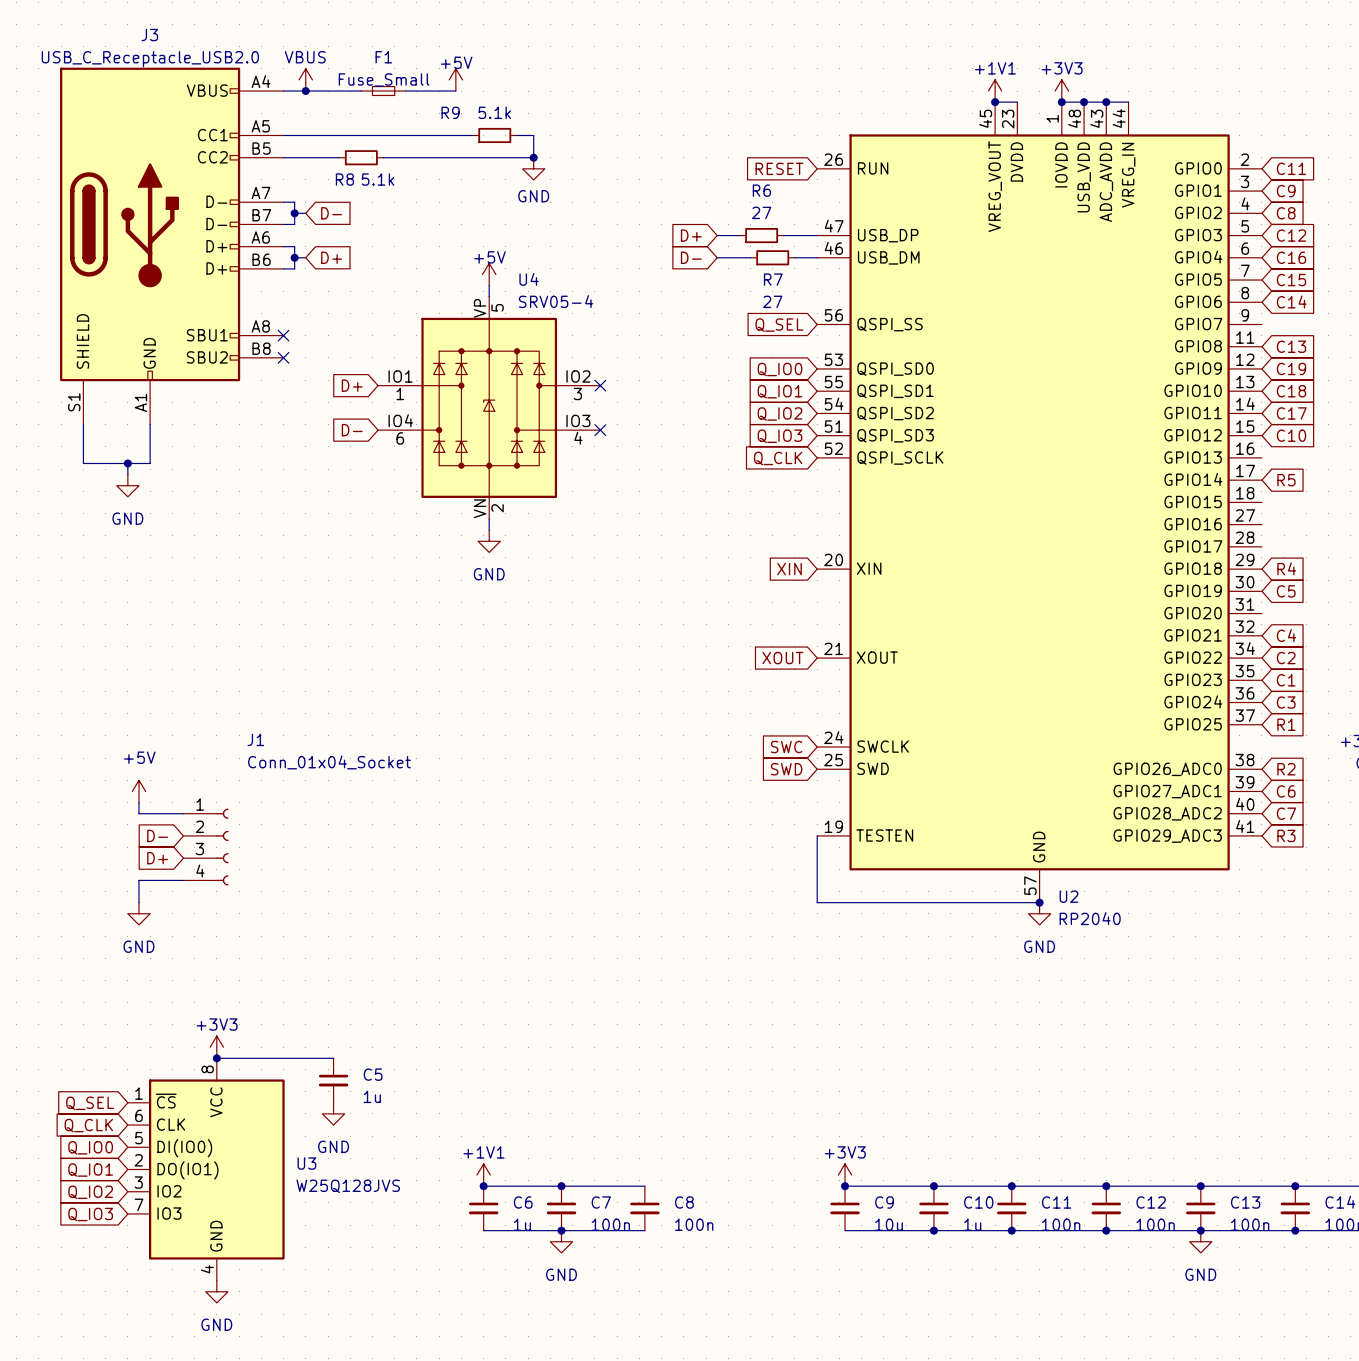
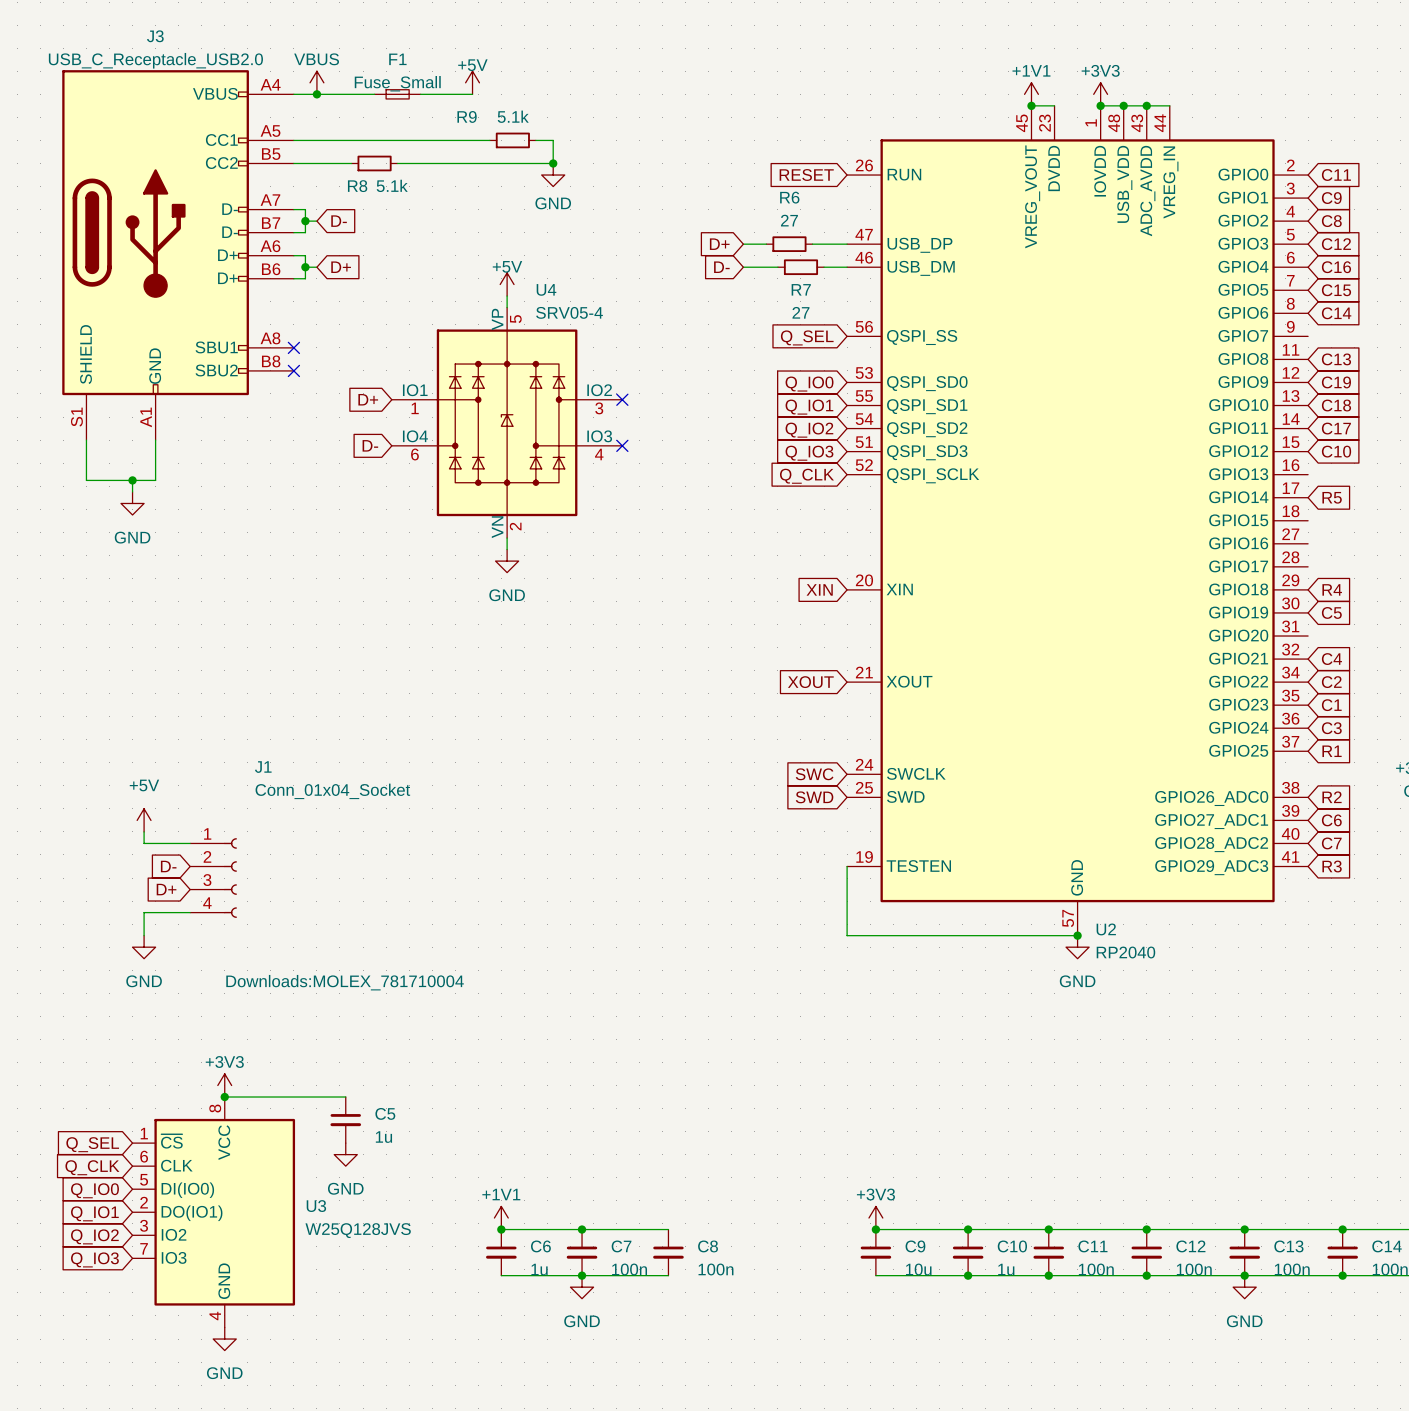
J1 text: none -> Downloads:MOLEX_781710004 (345, 982)

